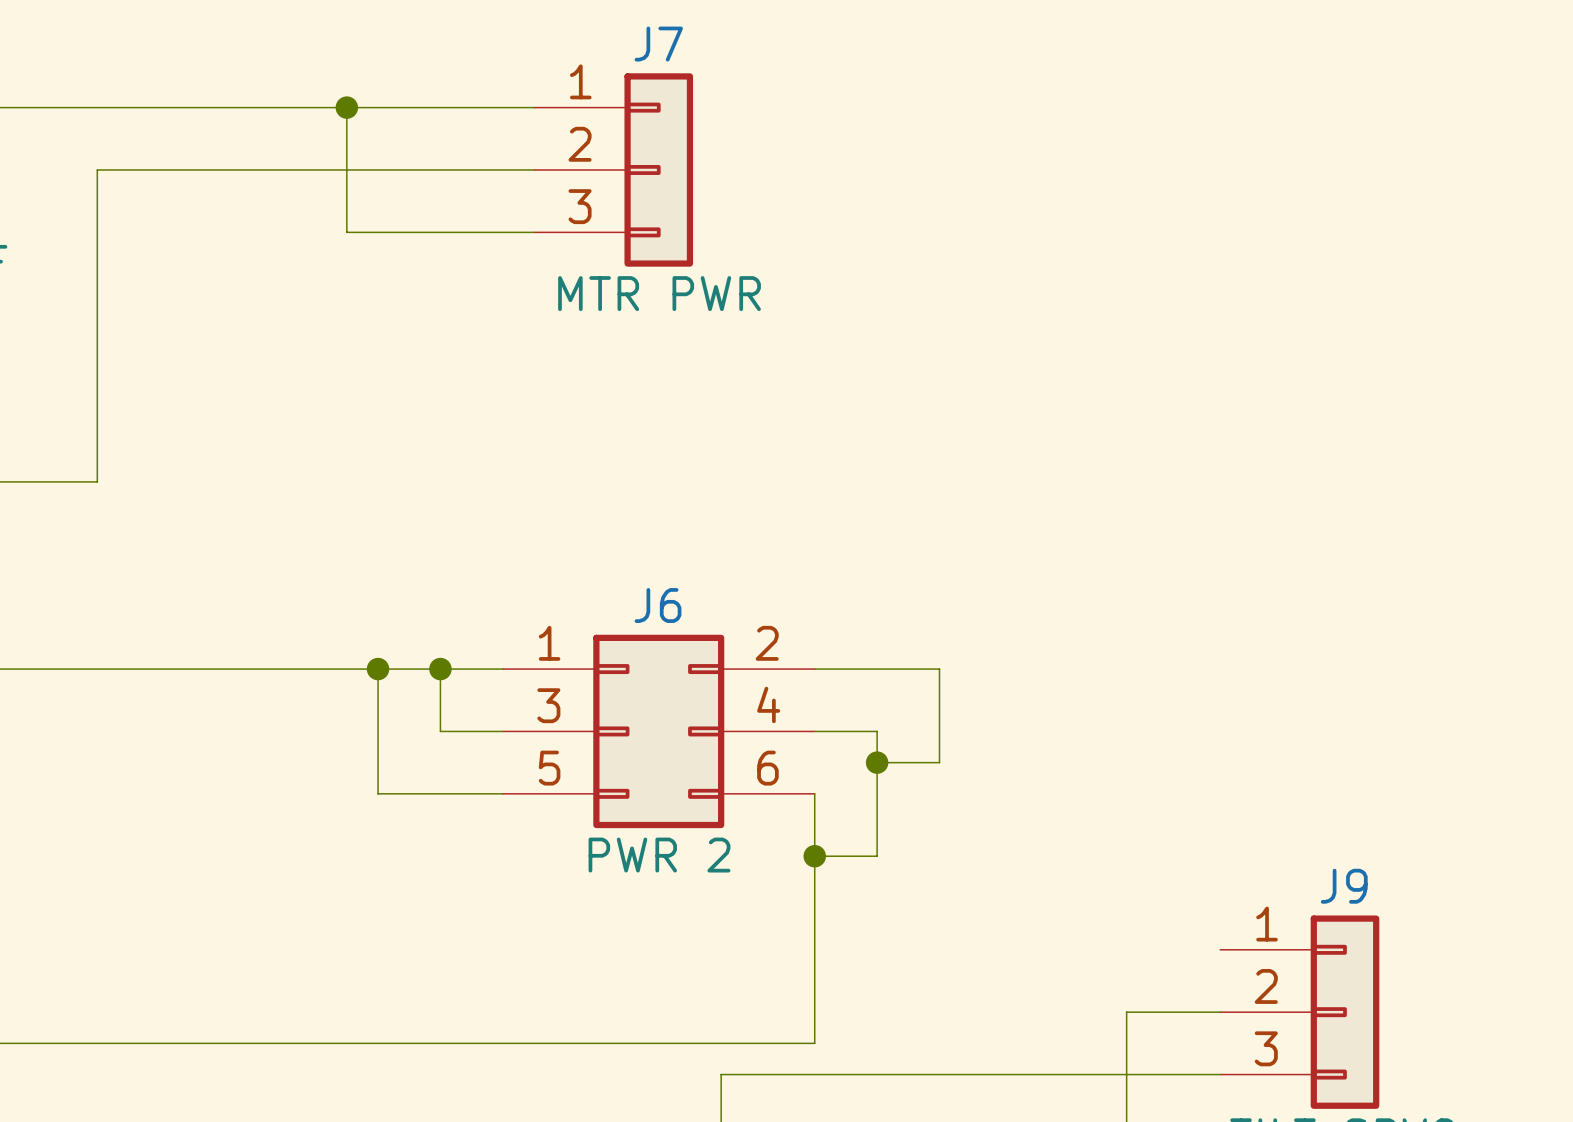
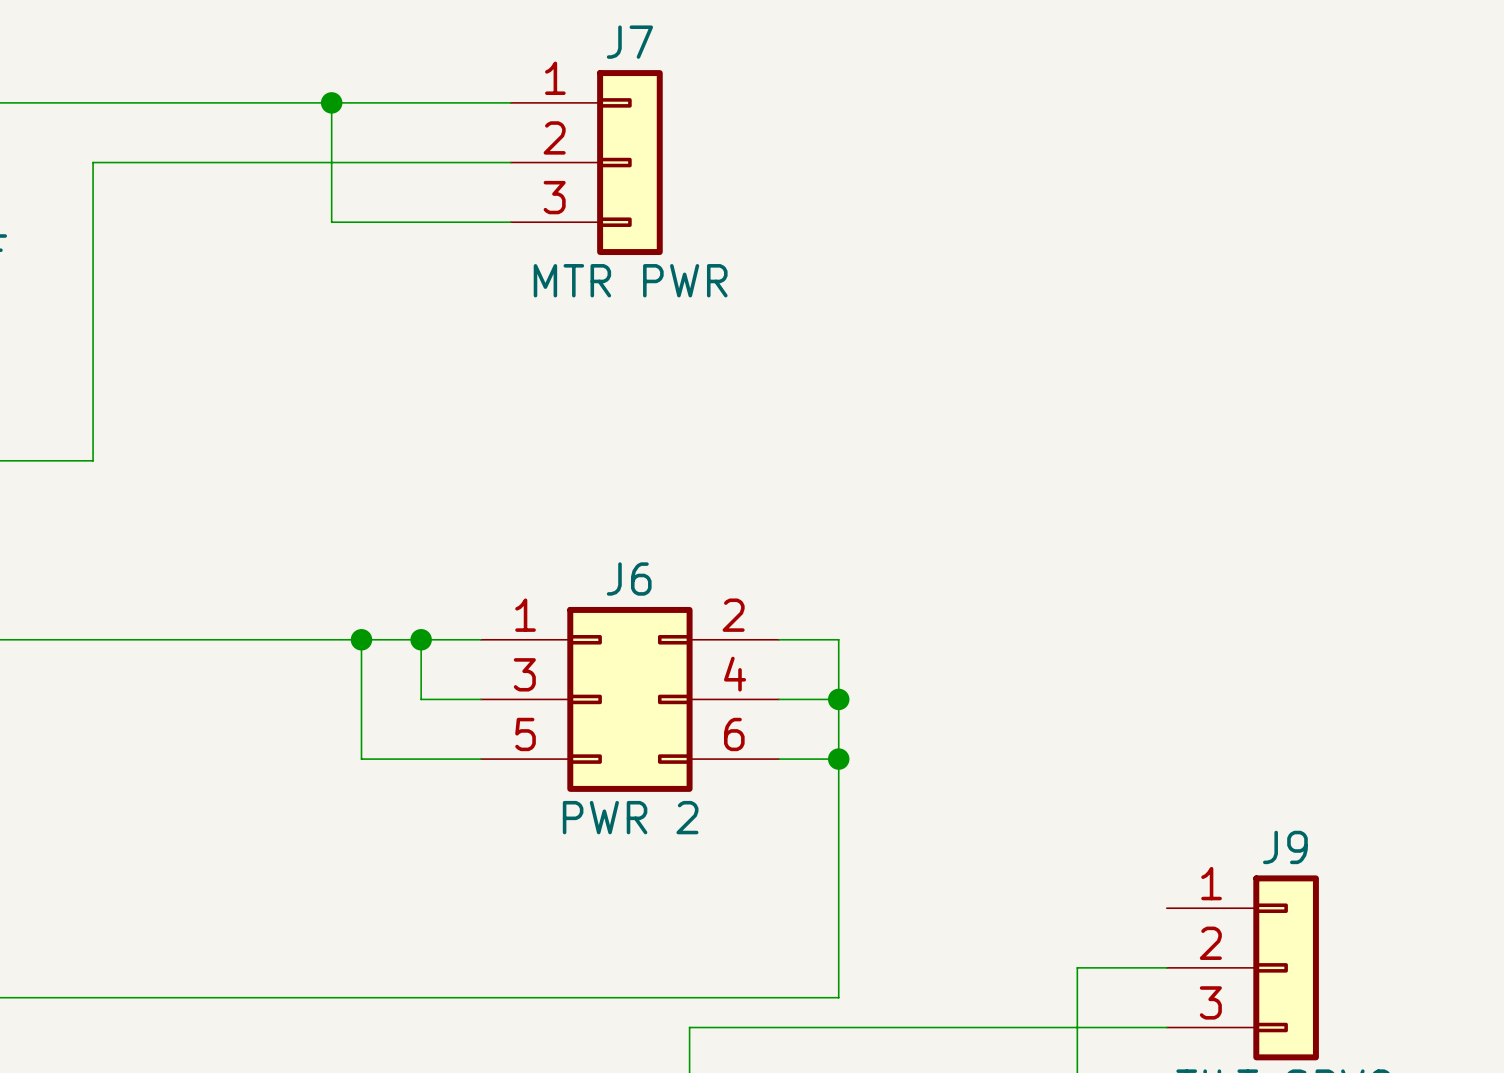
wire: (877, 669) (939, 669) (939, 762) (877, 762) -> (838, 639) (838, 699)
junction: none -> (838, 699)
junction: (877, 762) -> none
wire: (814, 793) (814, 1043) -> (838, 818) (838, 997) (779, 997)
junction: none -> (838, 759)
wire: (814, 856) (877, 856) -> (779, 759) (838, 759)
junction: (814, 856) -> none

